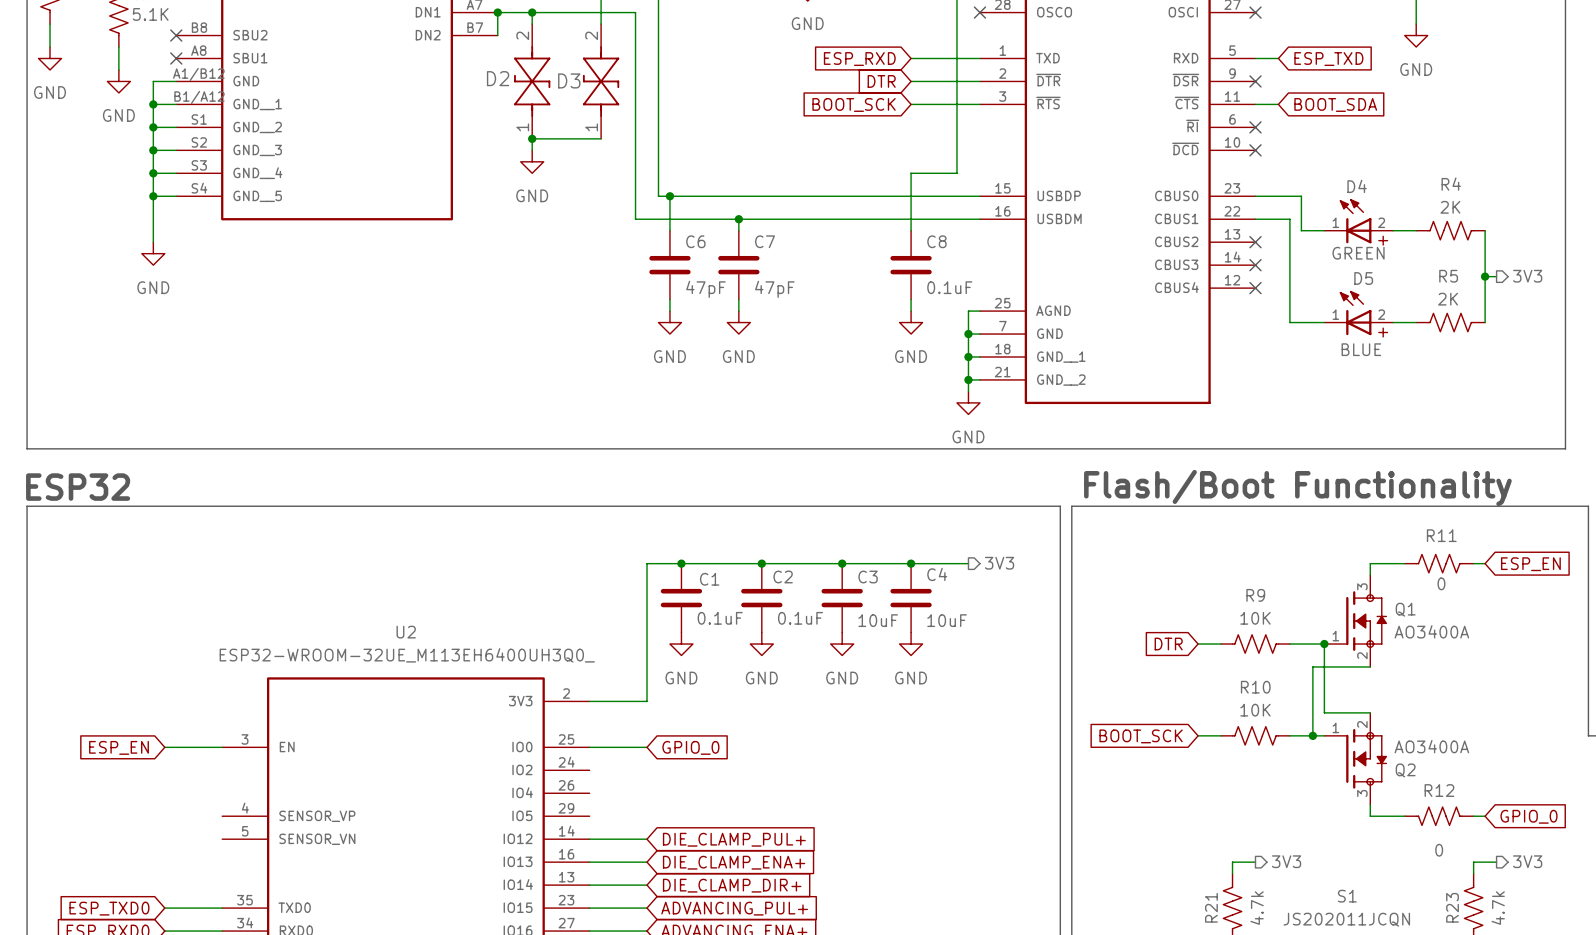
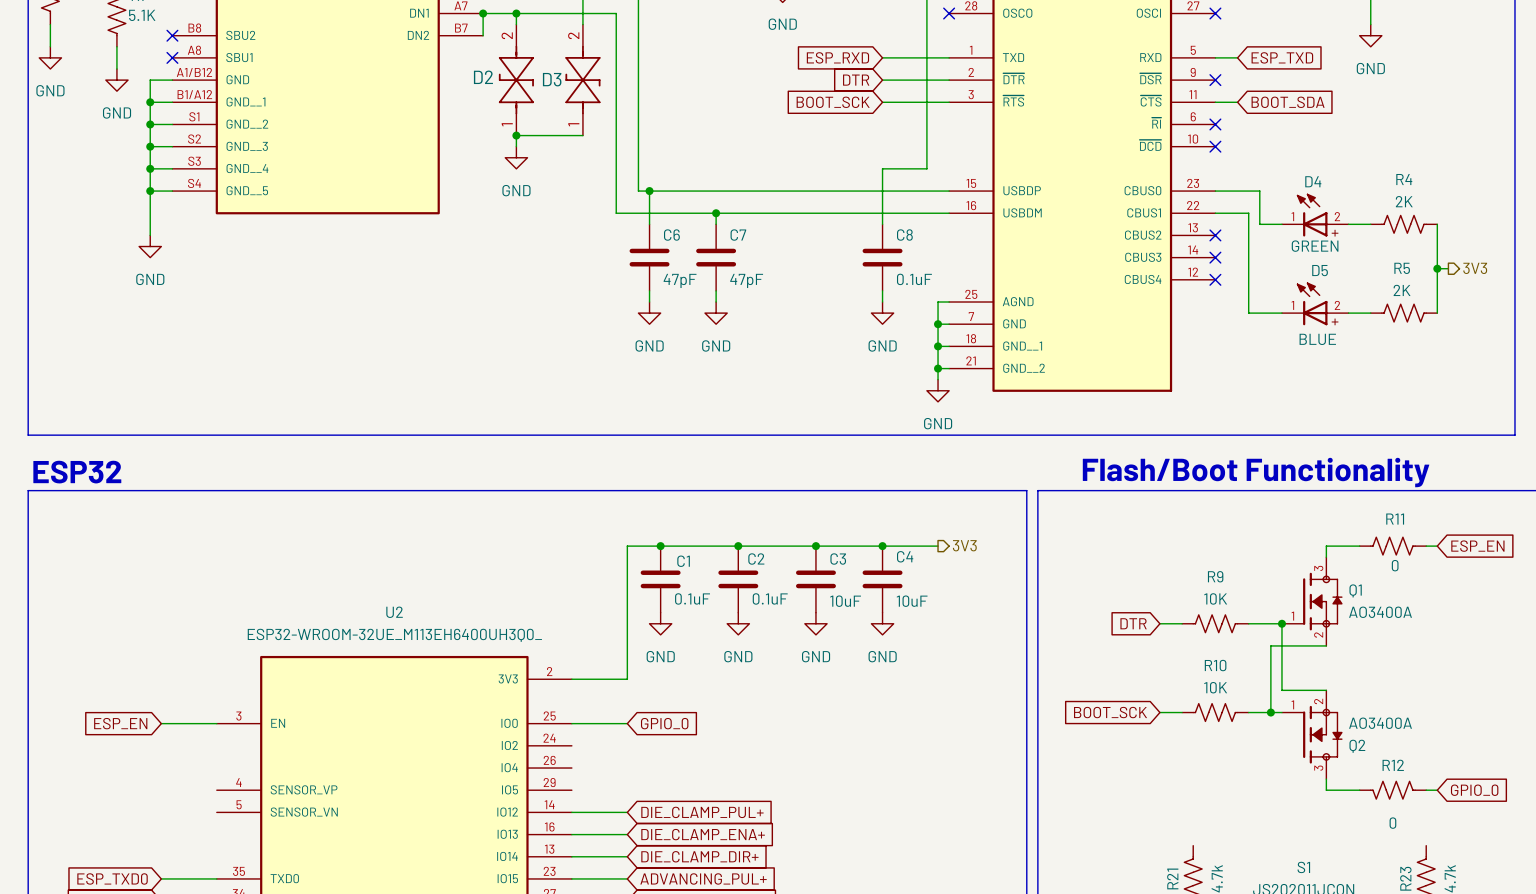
hierarchical label: 3V3 (1286, 861) -> none
hierarchical label: 3V3 (1527, 861) -> none
wire: (1255, 862) (1232, 862) (1232, 873) -> none
wire: (1496, 862) (1473, 862) (1473, 873) -> none

